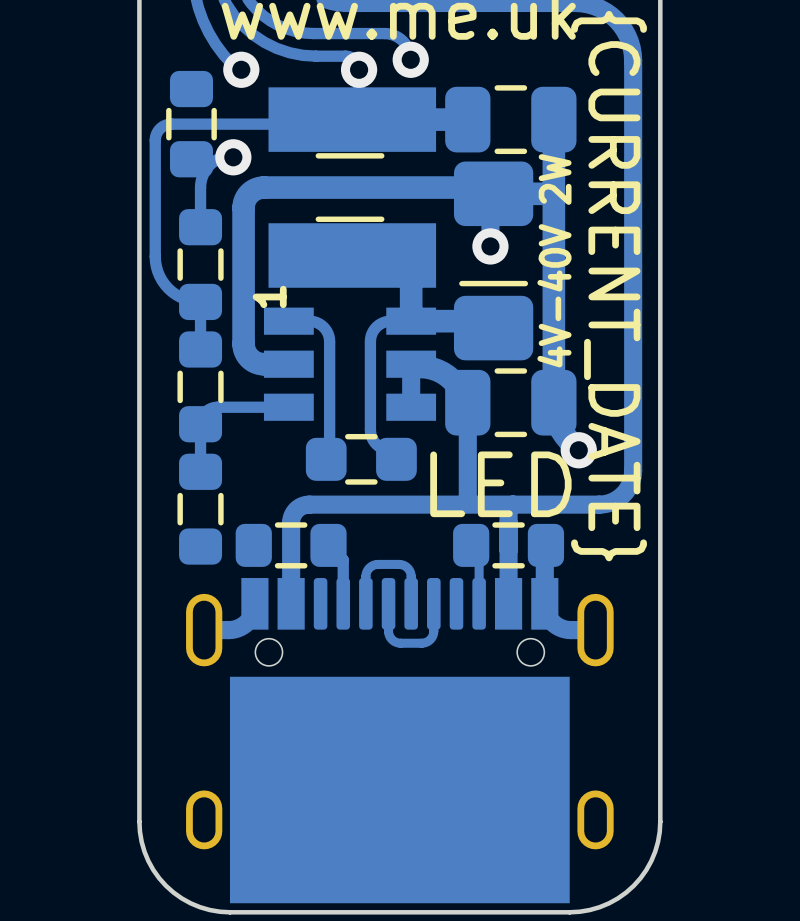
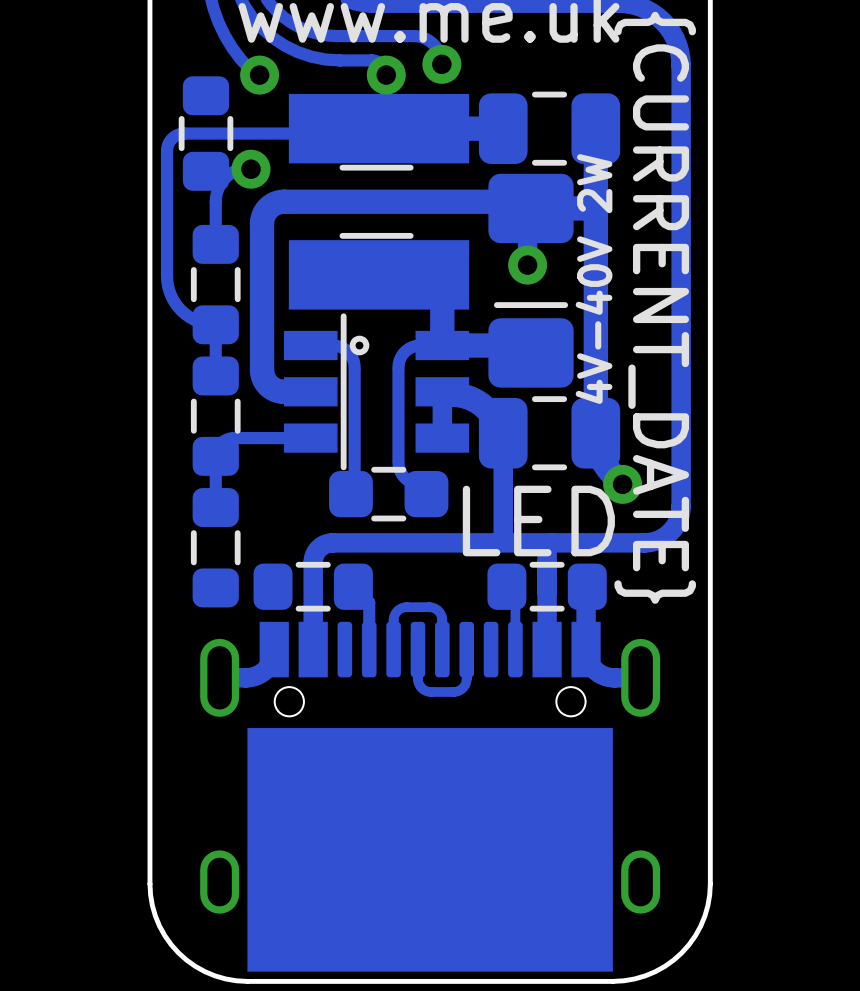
part footprint: [232, 86, 577, 481] -> [249, 93, 621, 518]

